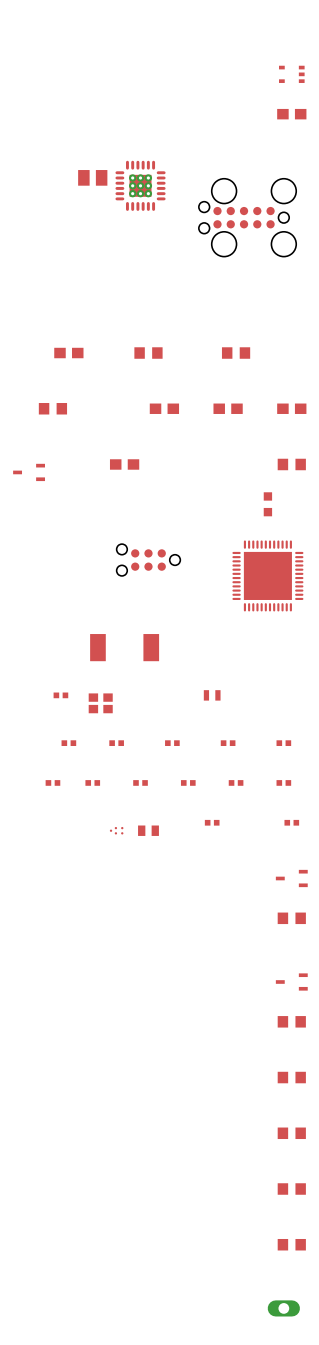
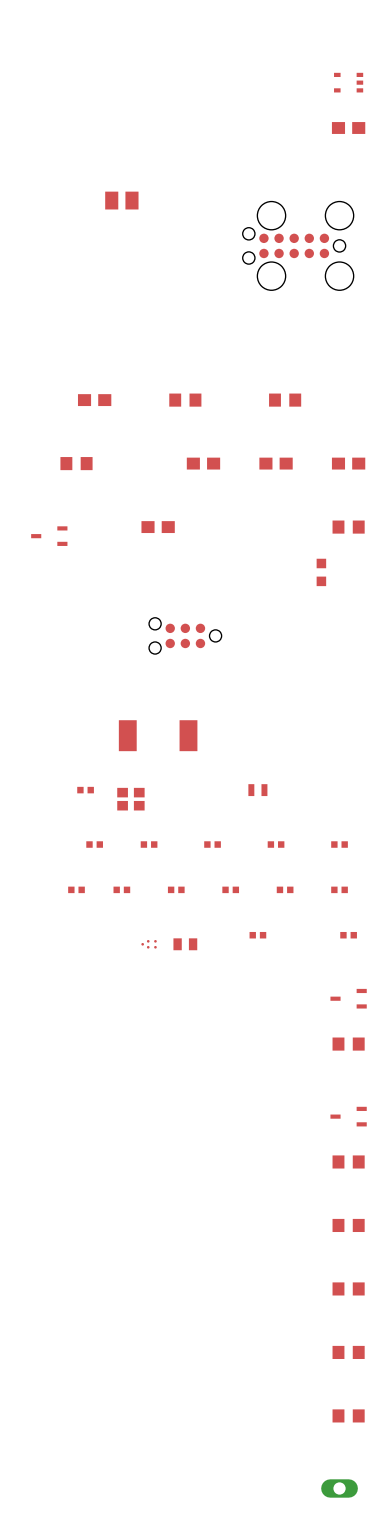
part: (140, 185) -> none
part: (267, 575) -> none

